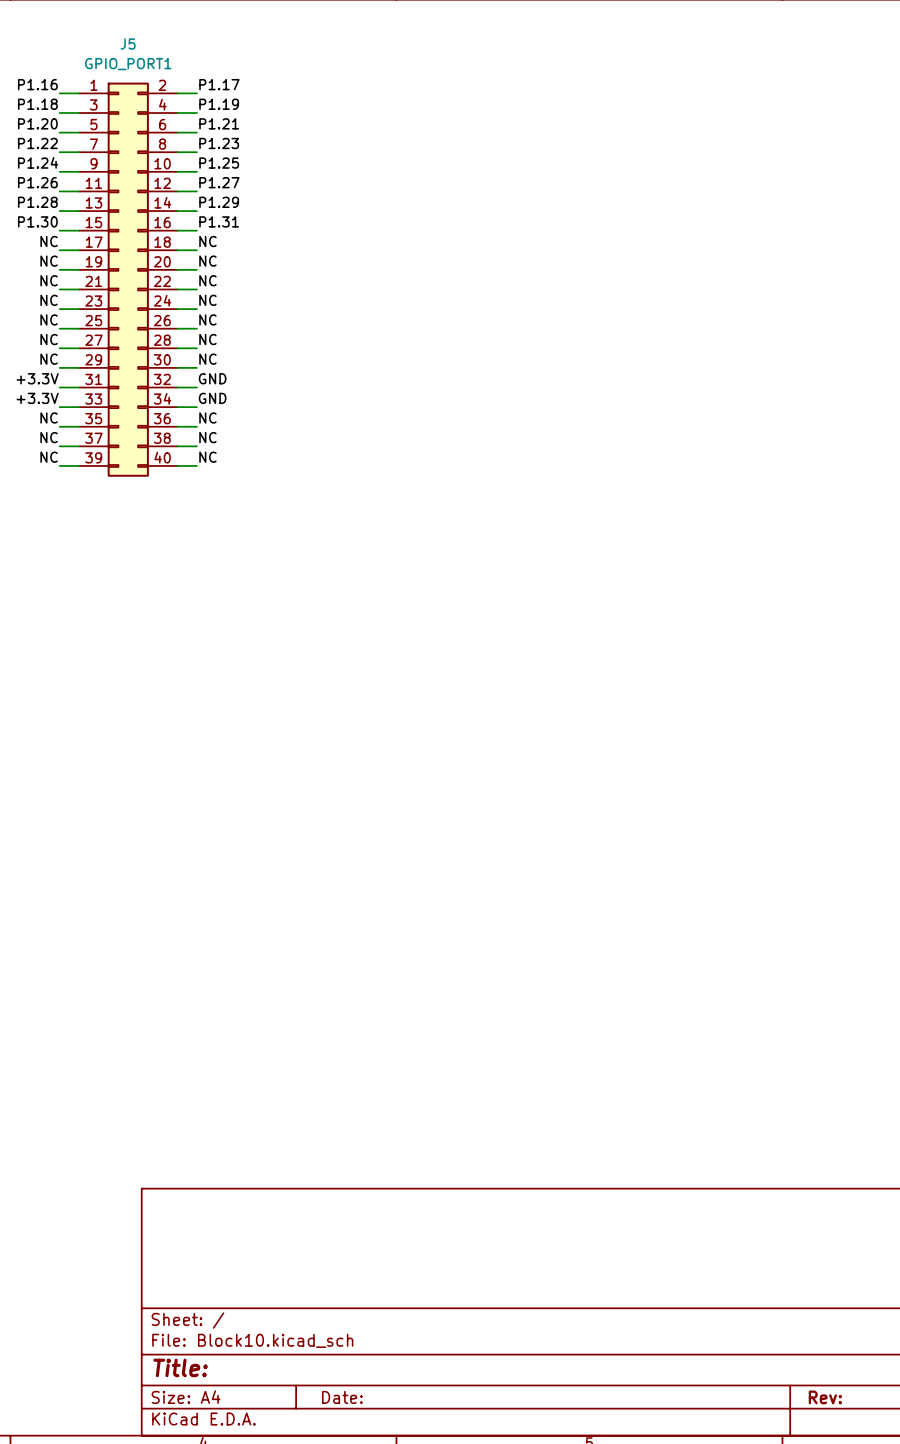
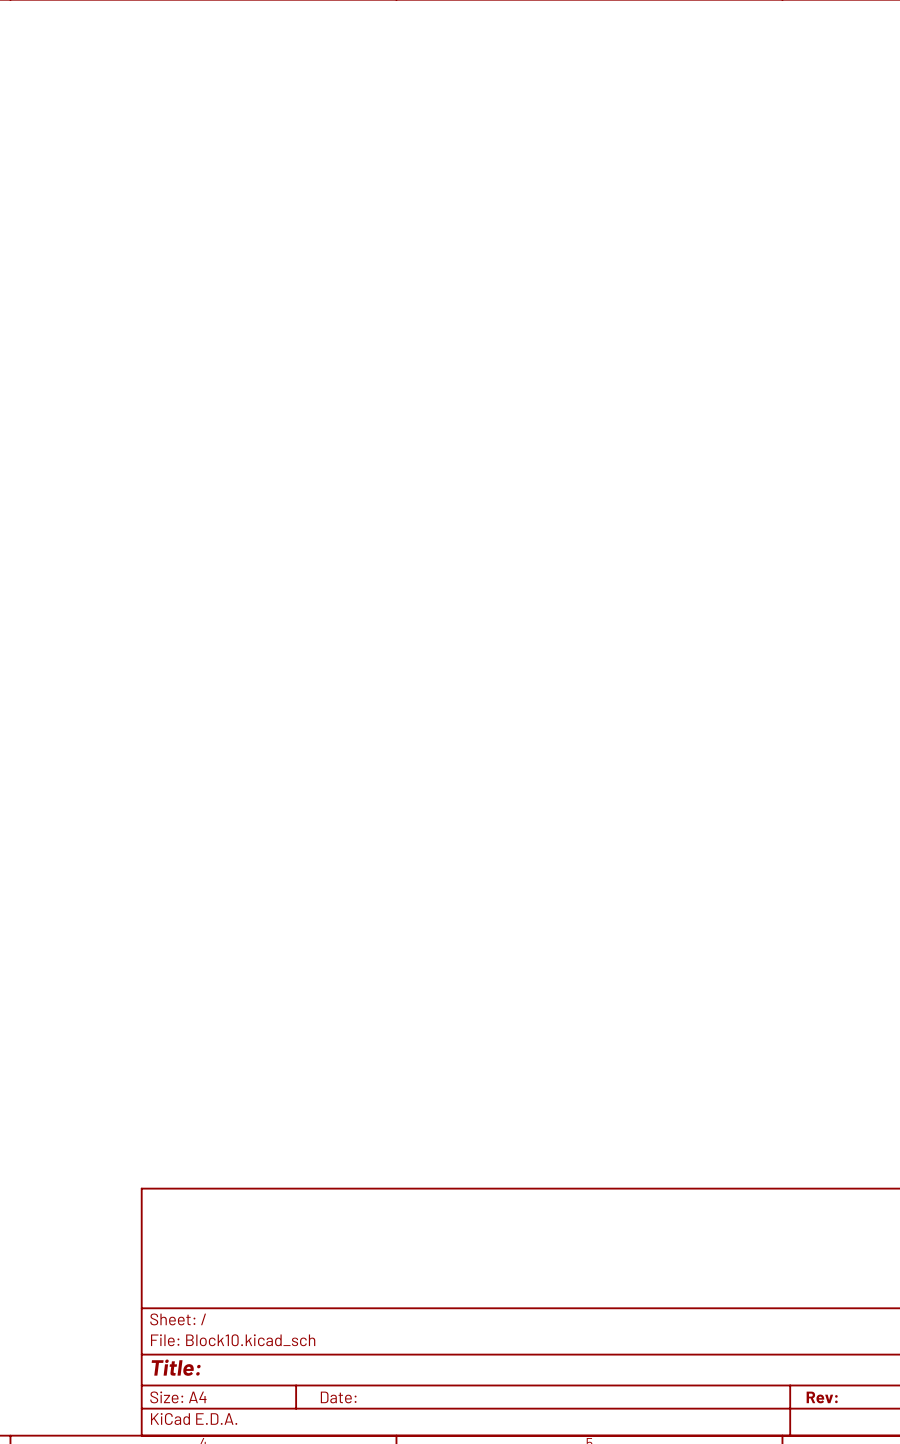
label: P1.16 (37, 84) -> none
label: P1.17 (219, 84) -> none
wire: (59, 93) (79, 93) -> none
wire: (177, 93) (196, 93) -> none
label: P1.18 (37, 104) -> none
label: P1.19 (219, 104) -> none
wire: (59, 113) (79, 113) -> none
wire: (177, 113) (196, 113) -> none
label: P1.20 (37, 123) -> none
label: P1.21 (219, 123) -> none
wire: (59, 132) (79, 132) -> none
wire: (177, 132) (196, 132) -> none
label: P1.22 (37, 143) -> none
label: P1.23 (219, 143) -> none
wire: (59, 152) (79, 152) -> none
wire: (177, 152) (196, 152) -> none
label: P1.24 (38, 162) -> none
label: P1.25 (219, 163) -> none
wire: (59, 171) (79, 171) -> none
wire: (177, 171) (196, 171) -> none
label: P1.26 (37, 182) -> none
label: P1.27 (219, 182) -> none
wire: (59, 191) (79, 191) -> none
wire: (177, 191) (196, 191) -> none
label: P1.28 (37, 202) -> none
label: P1.29 (219, 202) -> none
wire: (59, 211) (79, 211) -> none
wire: (177, 211) (196, 211) -> none
label: P1.30 (37, 221) -> none
label: P1.31 (219, 221) -> none
wire: (59, 230) (79, 230) -> none
wire: (177, 230) (196, 230) -> none
label: NC (49, 241) -> none
label: NC (207, 241) -> none
wire: (59, 250) (79, 250) -> none
wire: (177, 250) (196, 250) -> none
label: NC (49, 261) -> none
label: NC (207, 261) -> none
wire: (59, 269) (79, 269) -> none
wire: (177, 269) (196, 269) -> none
J5: GPIO_PORT1 (128, 279) -> none
label: NC (49, 280) -> none
label: NC (207, 280) -> none
wire: (59, 289) (79, 289) -> none
wire: (177, 289) (196, 289) -> none
label: NC (49, 300) -> none
label: NC (207, 300) -> none
wire: (59, 309) (79, 309) -> none
wire: (177, 309) (196, 309) -> none
label: NC (49, 319) -> none
label: NC (207, 319) -> none
wire: (59, 328) (79, 328) -> none
wire: (177, 328) (196, 328) -> none
label: NC (49, 339) -> none
label: NC (207, 339) -> none
wire: (59, 348) (79, 348) -> none
wire: (177, 348) (196, 348) -> none
label: NC (49, 359) -> none
label: NC (207, 359) -> none
wire: (59, 367) (79, 367) -> none
wire: (177, 367) (196, 367) -> none
label: +3.3V (37, 378) -> none
label: GND (212, 378) -> none
wire: (59, 387) (79, 387) -> none
wire: (177, 387) (196, 387) -> none
label: +3.3V (37, 398) -> none
label: GND (212, 398) -> none
wire: (59, 407) (79, 407) -> none
wire: (177, 407) (196, 407) -> none
label: NC (49, 417) -> none
label: NC (207, 417) -> none
wire: (59, 426) (79, 426) -> none
wire: (177, 426) (196, 426) -> none
label: NC (49, 437) -> none
label: NC (207, 437) -> none
wire: (59, 446) (79, 446) -> none
wire: (177, 446) (196, 446) -> none
label: NC (49, 457) -> none
label: NC (207, 457) -> none
wire: (59, 465) (79, 465) -> none
wire: (177, 465) (196, 465) -> none

